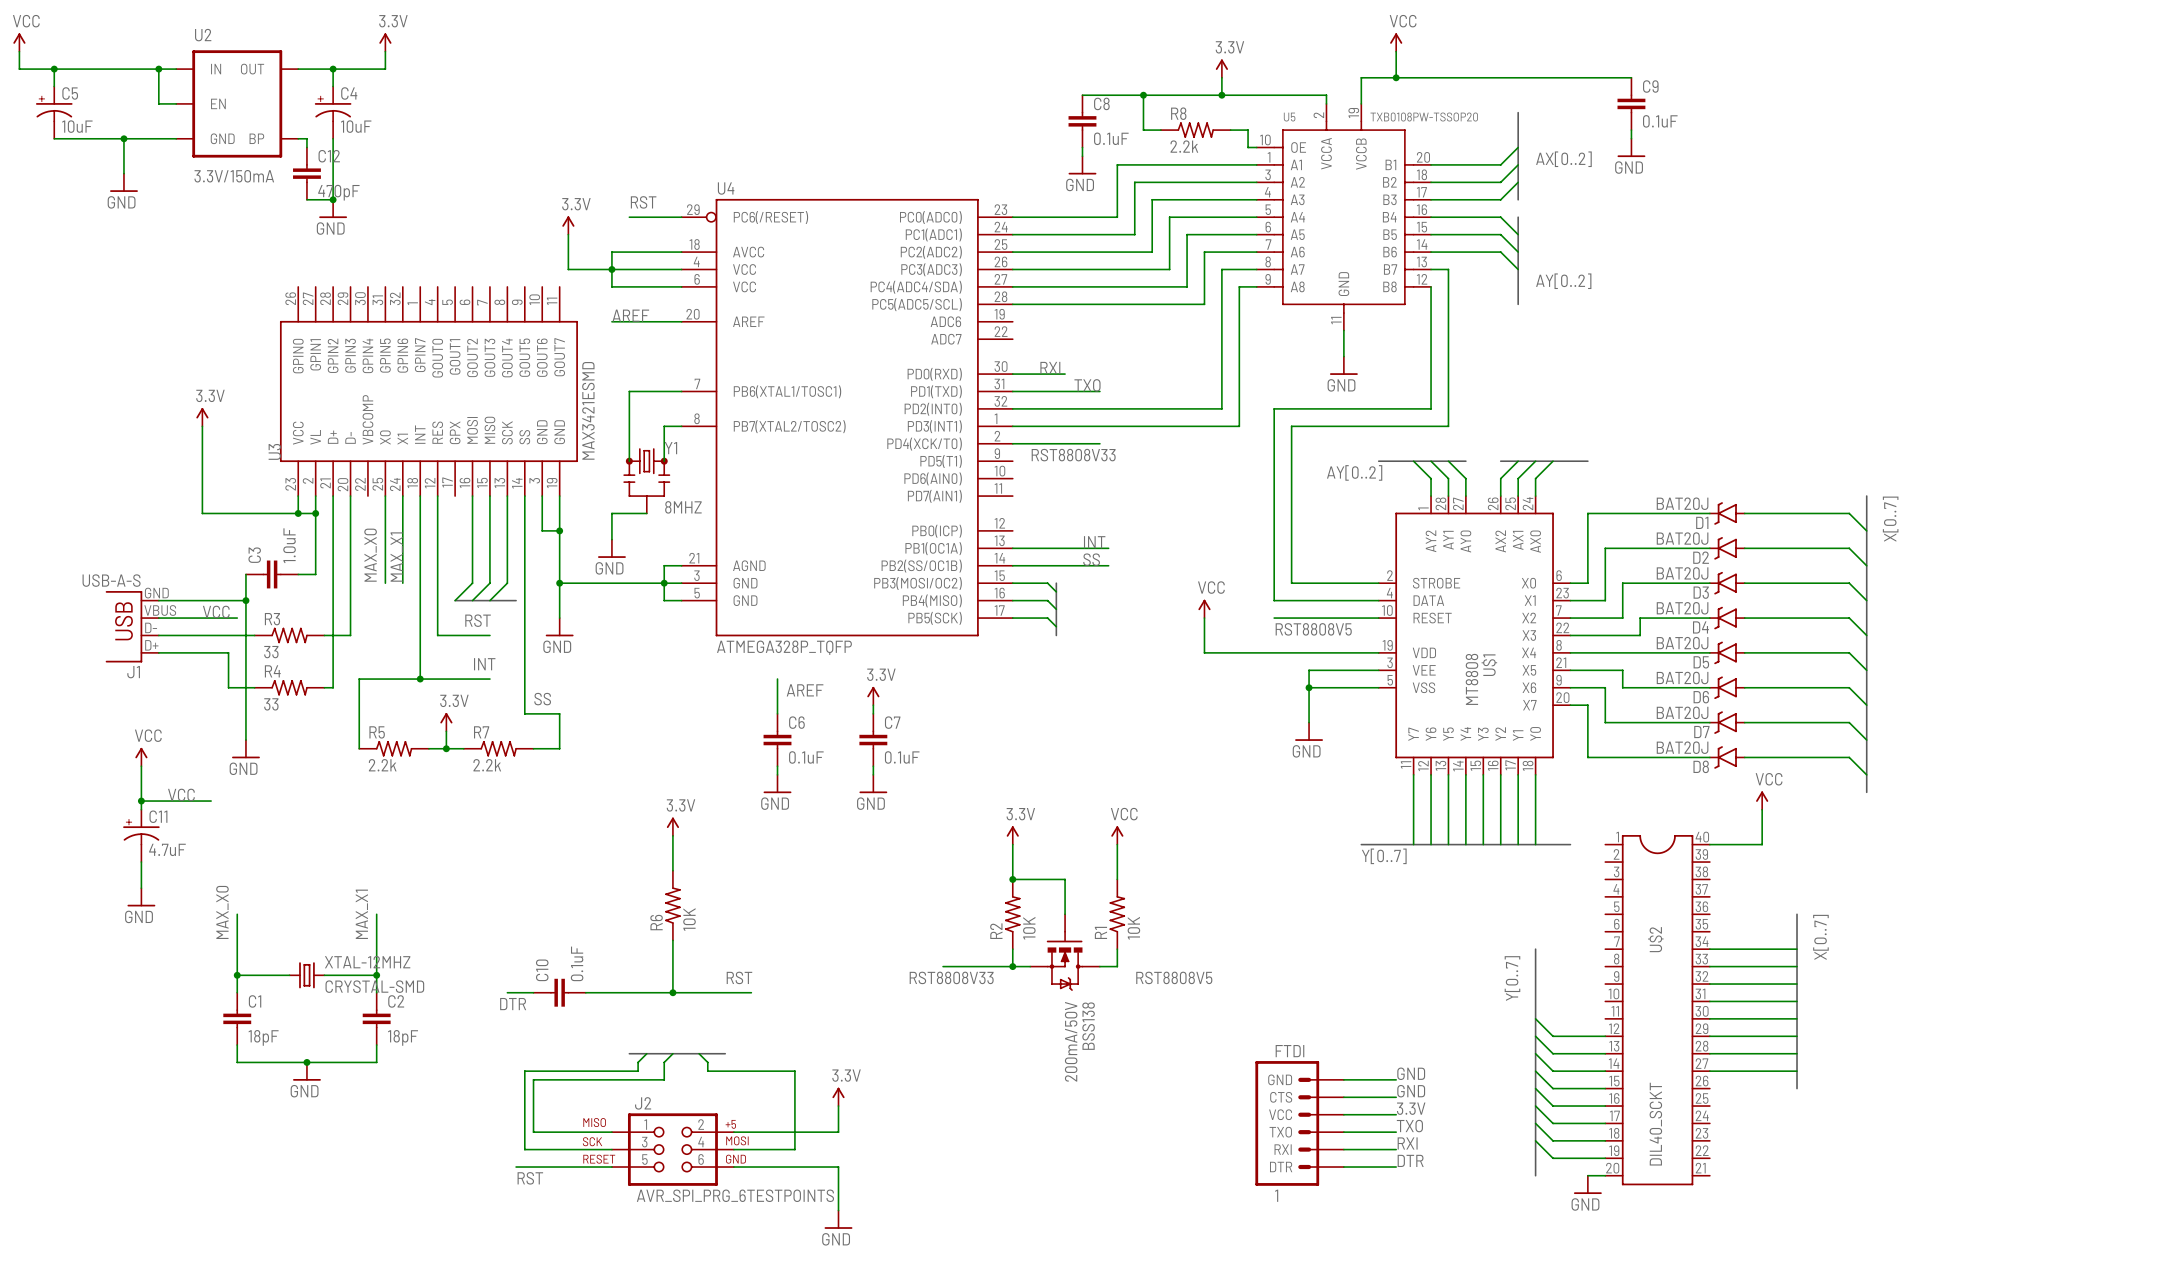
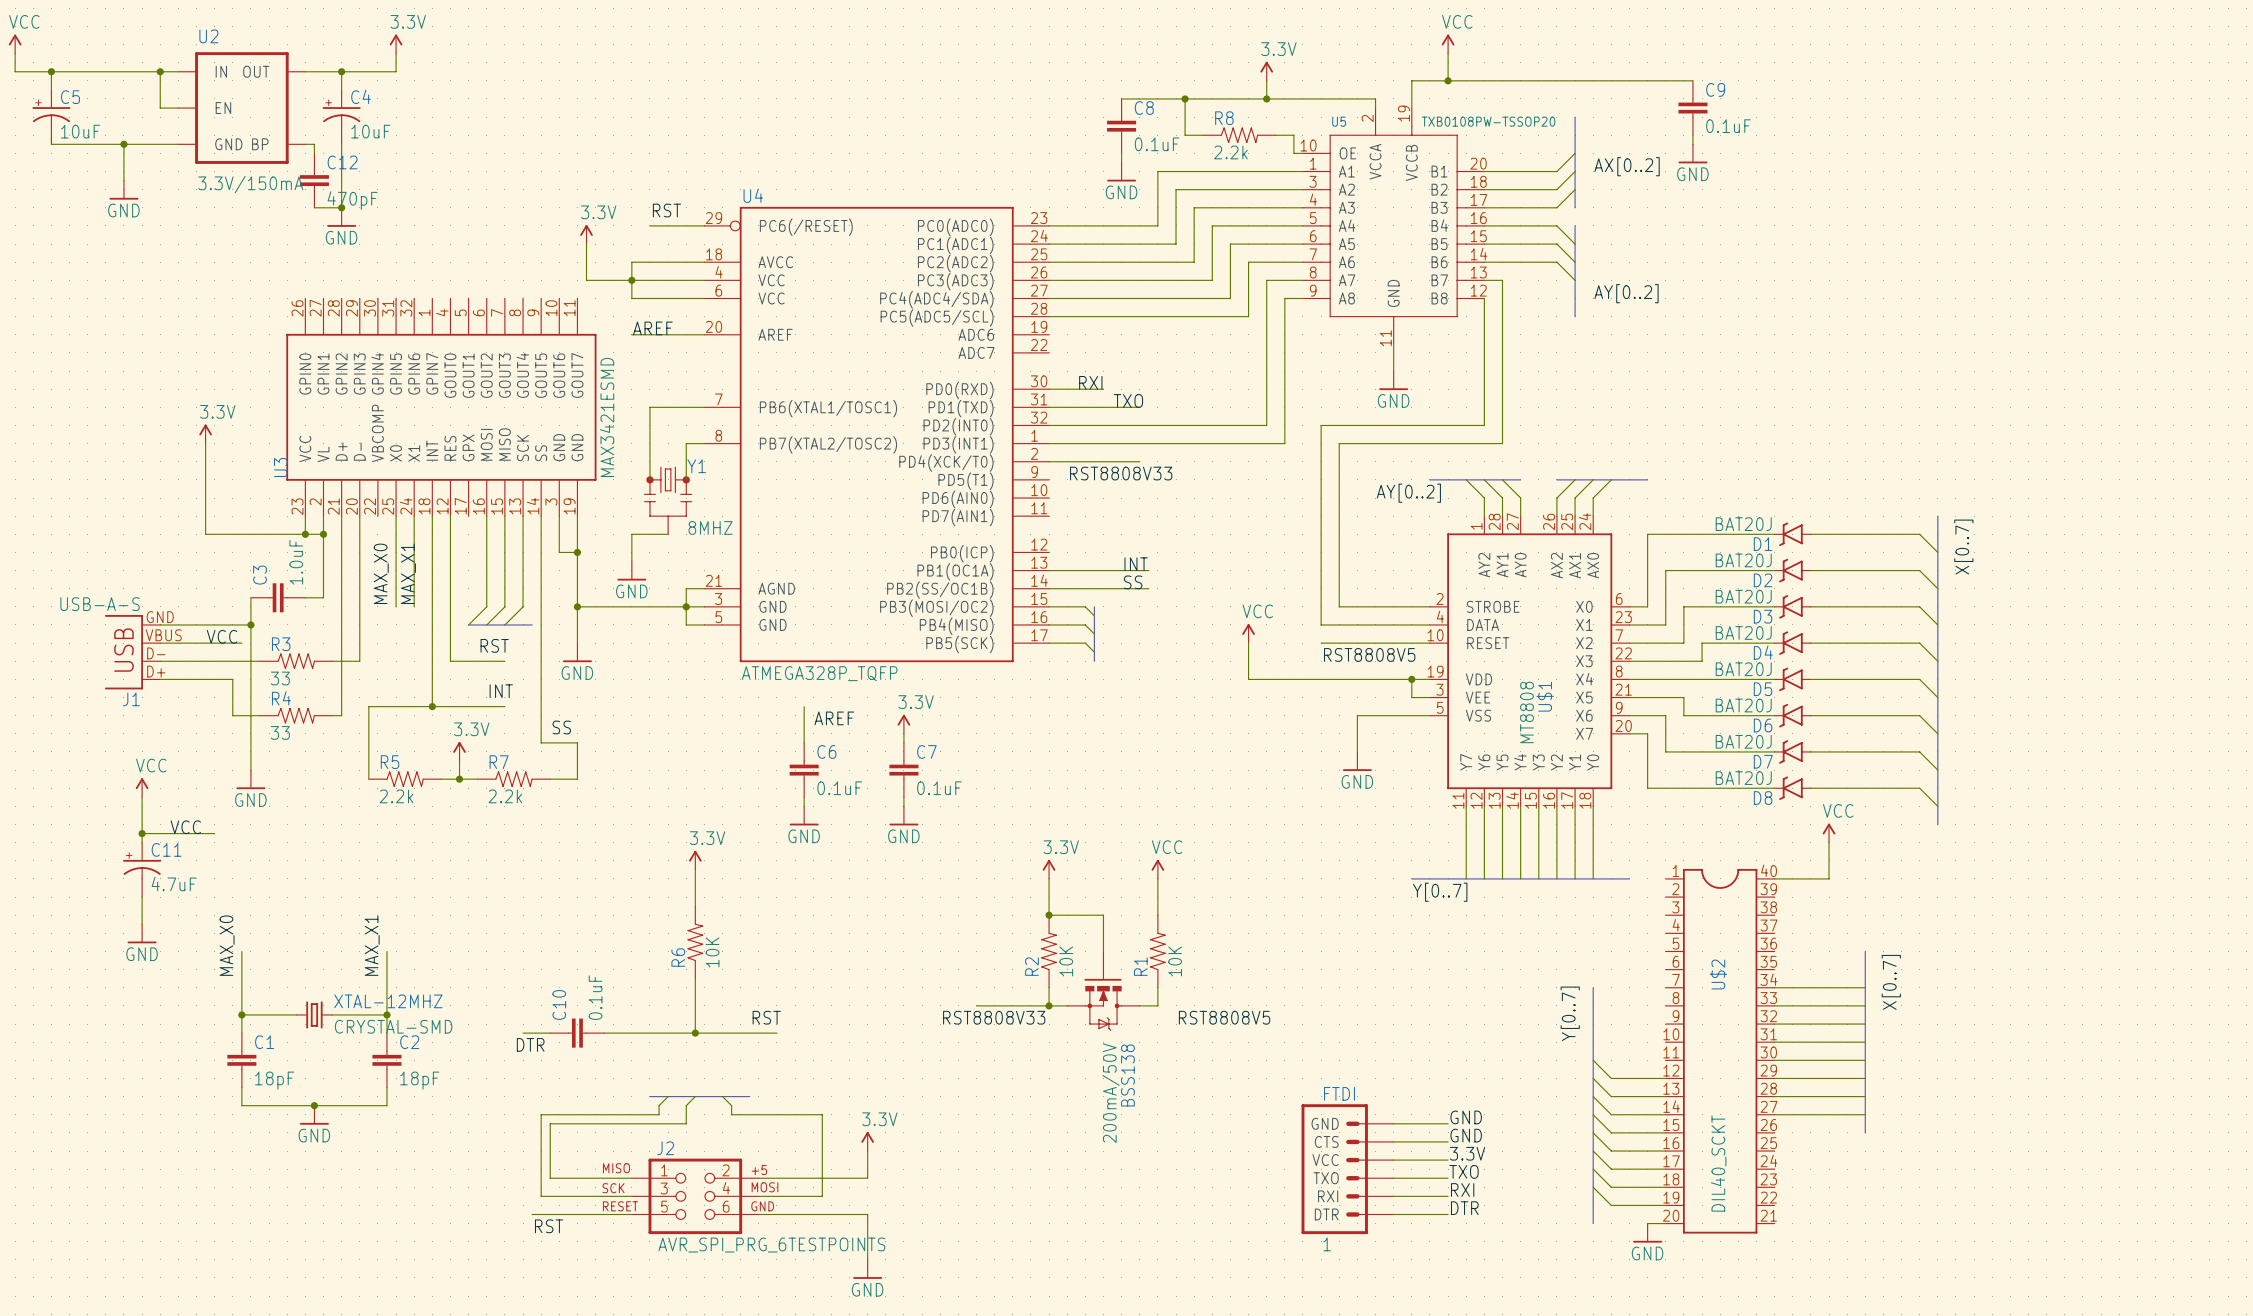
junction: none -> (1411, 679)
wire: (1361, 670) (1309, 670) (1309, 687) -> (1411, 697) (1411, 679)
junction: (1309, 687) -> none

